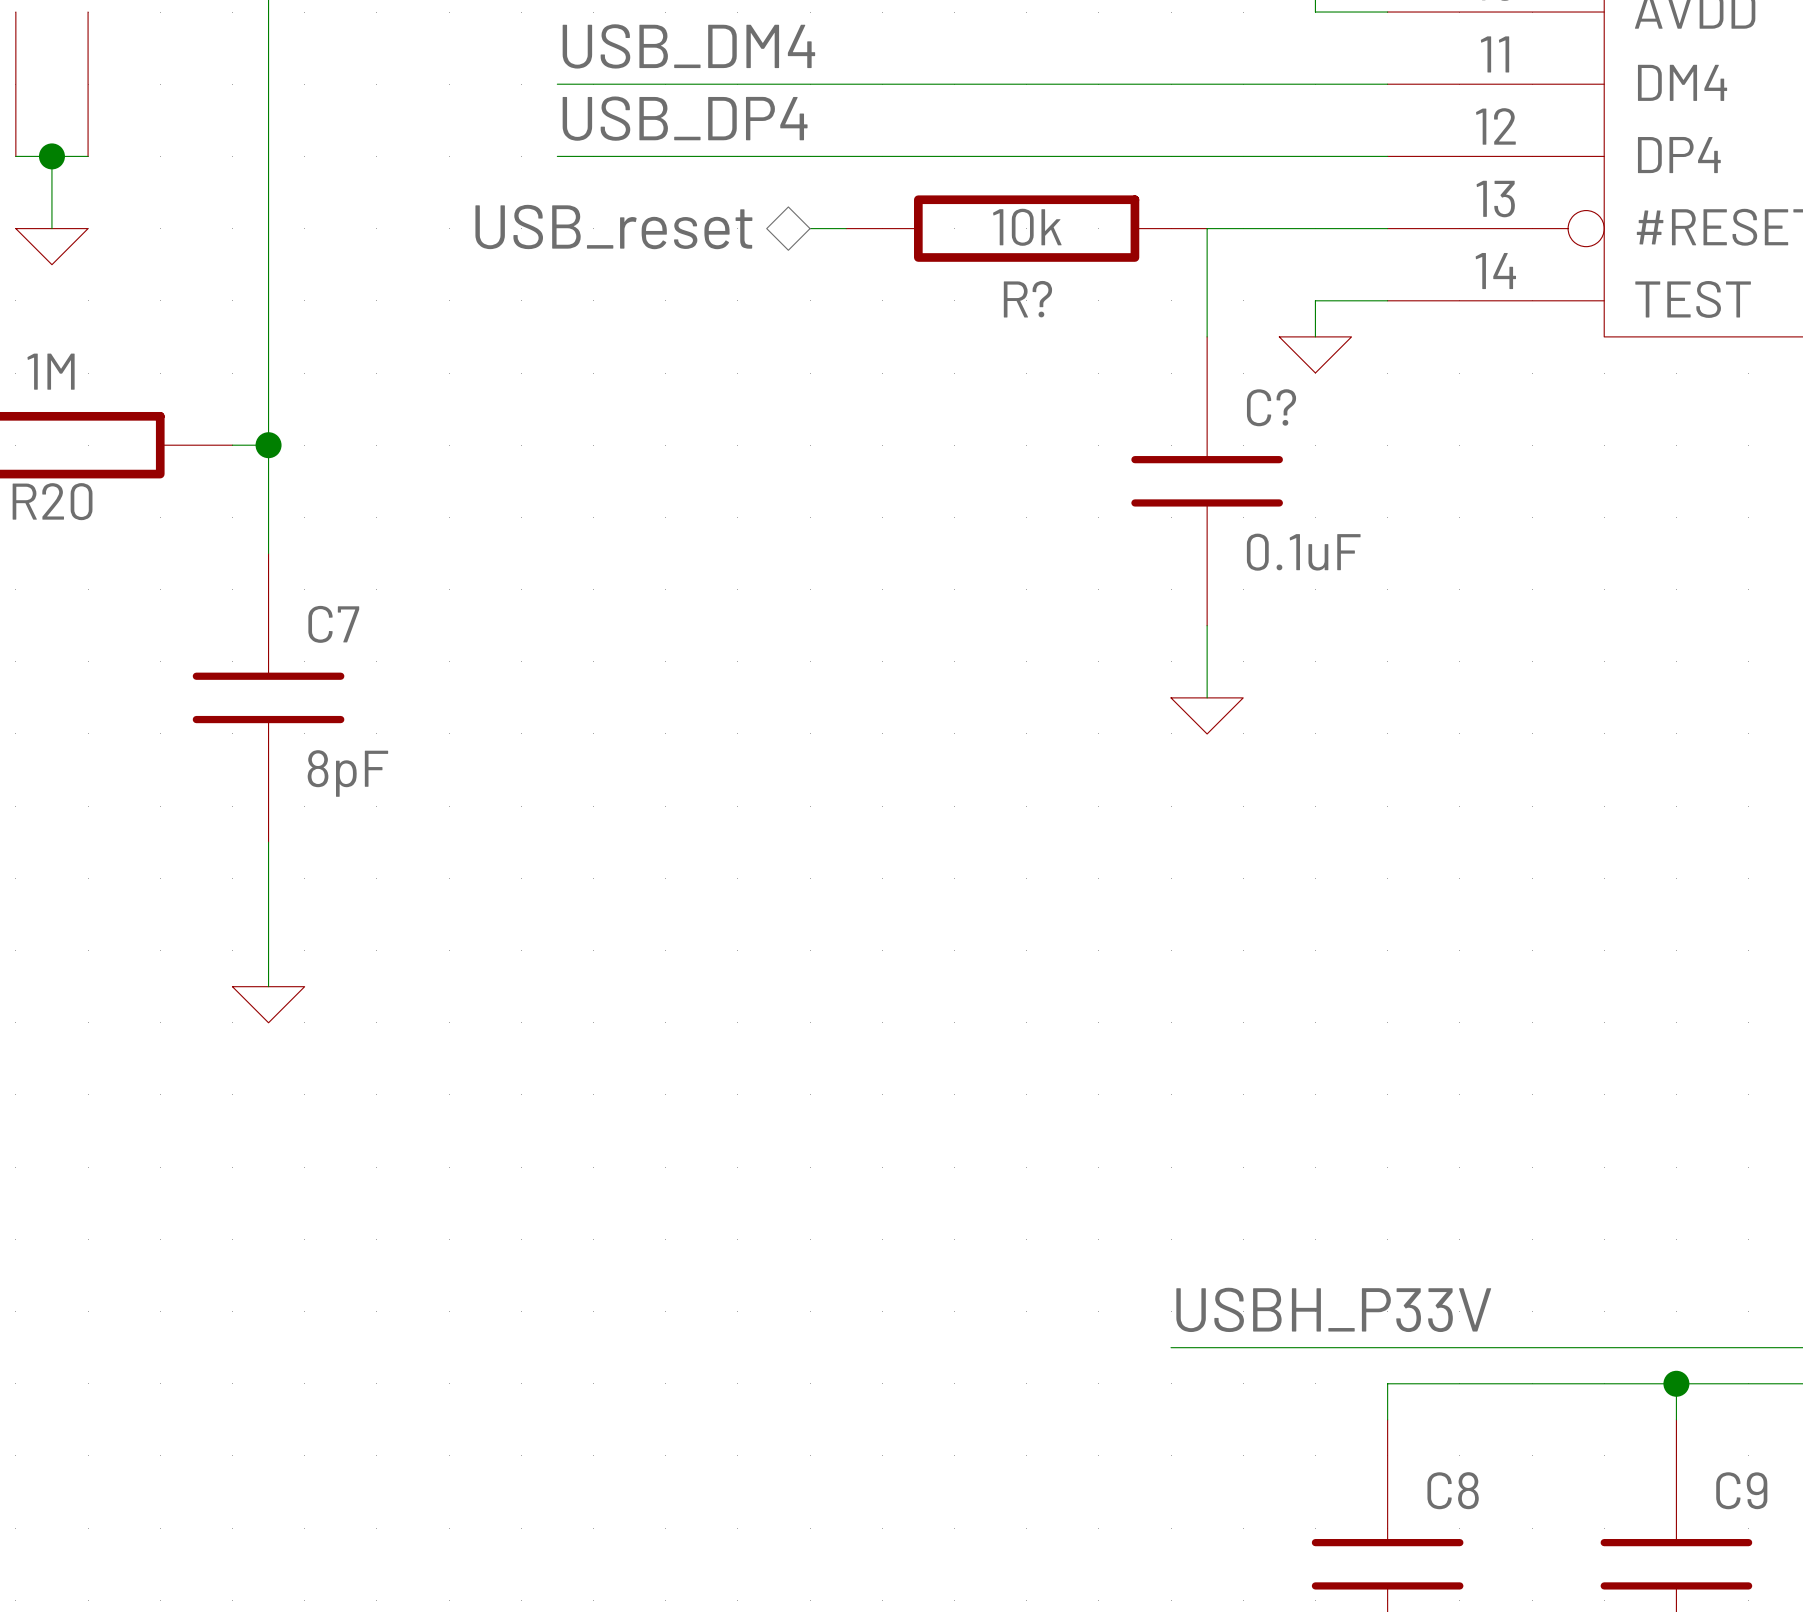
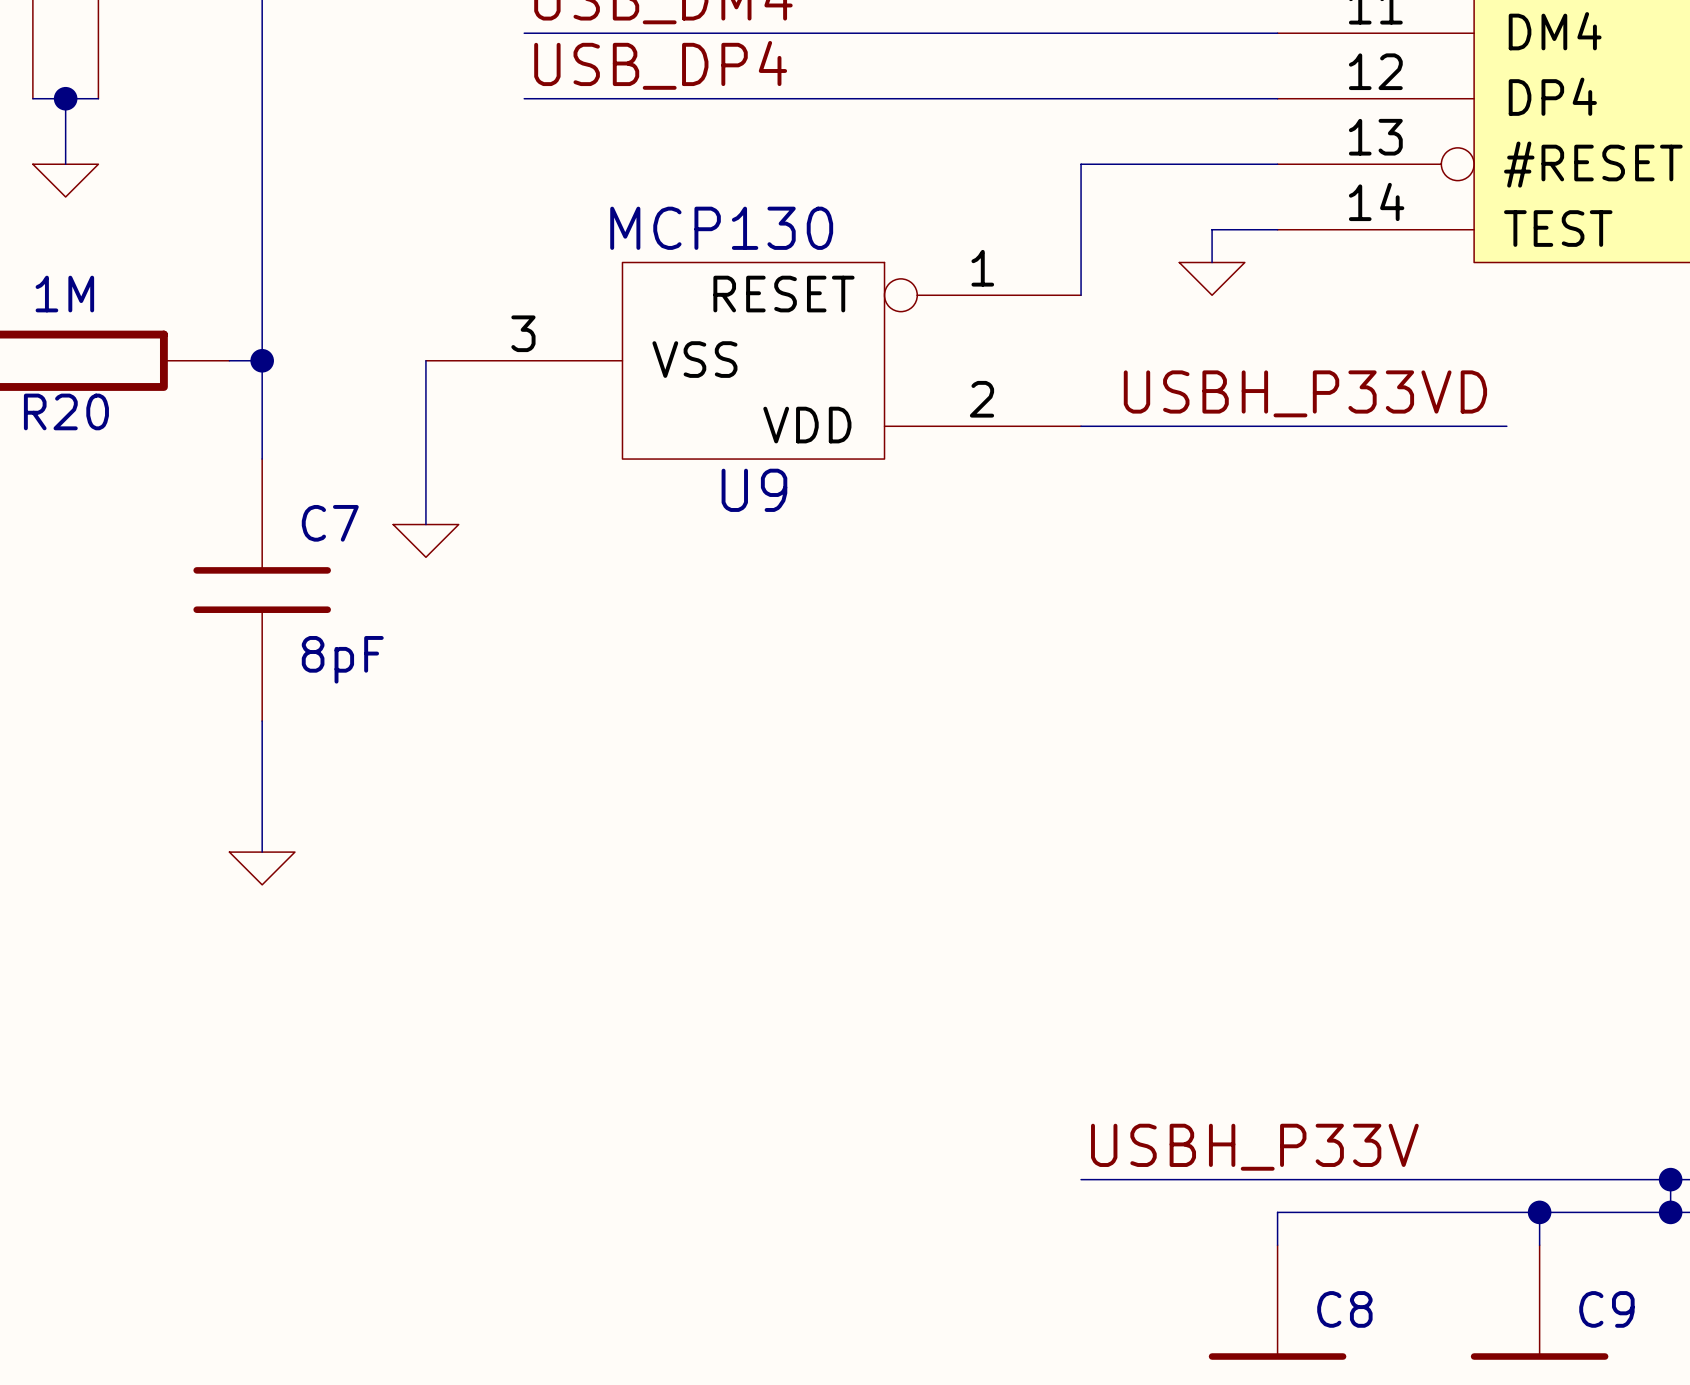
hierarchical label: USB_reset (613, 227) -> none
wire: (810, 228) (846, 228) -> none
R?: 10k (1026, 228) -> none
wire: (1207, 228) (1207, 336) -> (1113, 164) (1081, 164) (1081, 295)
wire: none -> (425, 360) (425, 524)
U9: none -> MCP130 (753, 360)
label: none -> USBH_P33VD (1305, 393)
C?: 0.1uF (1207, 481) -> none
wire: none -> (1081, 426) (1506, 426)
wire: (1207, 625) (1207, 697) -> none
power symbol: none -> (425, 540)
power symbol: (1207, 715) -> none

